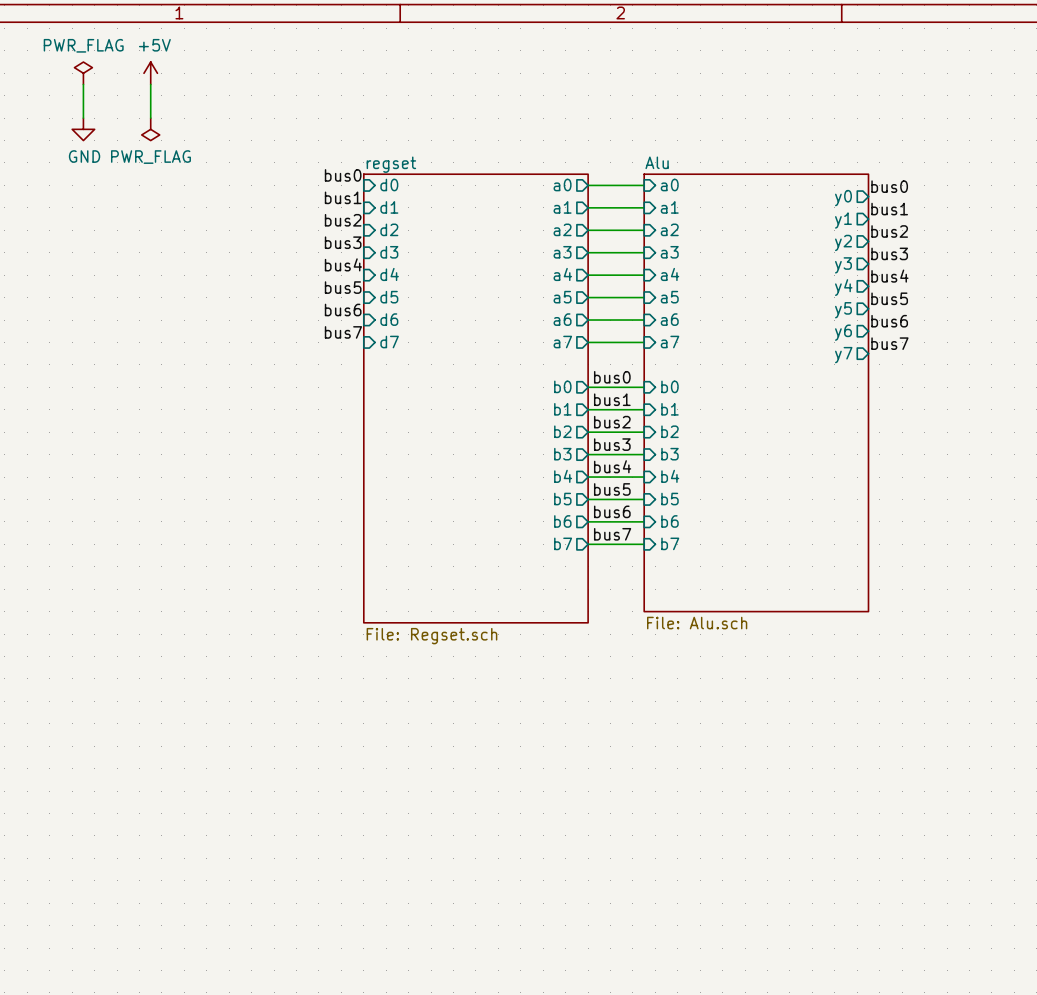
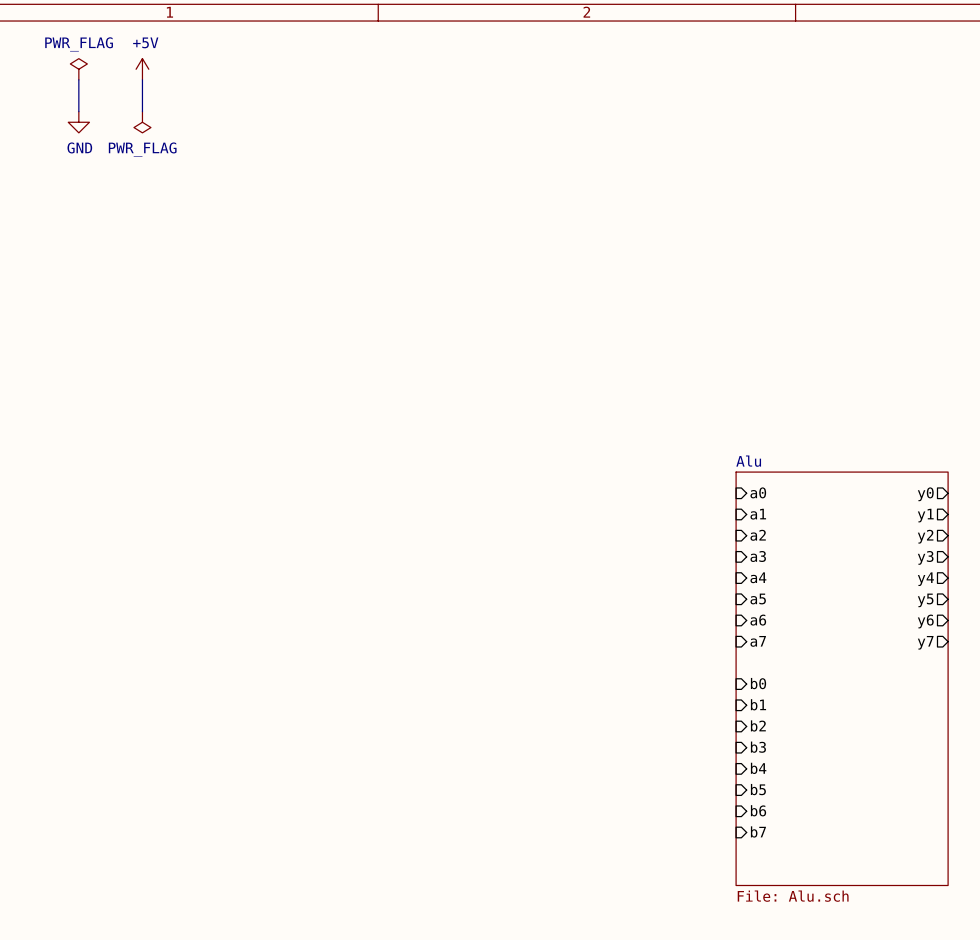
label: bus0 (343, 175) -> none
sheet pin: d0 (389, 185) -> none
sheet pin: a0 (562, 185) -> none
wire: (588, 185) (644, 185) -> none
sheet pin: a0 (669, 185) -> none
label: bus0 (889, 186) -> none
label: bus1 (343, 197) -> none
sheet pin: y0 (843, 198) -> none
sheet pin: d1 (389, 207) -> none
sheet pin: a1 (562, 207) -> none
wire: (588, 207) (644, 207) -> none
sheet pin: a1 (669, 207) -> none
label: bus1 (889, 209) -> none
label: bus2 (343, 220) -> none
sheet pin: y1 (843, 220) -> none
sheet pin: d2 (389, 229) -> none
sheet pin: a2 (562, 229) -> none
sheet pin: a2 (669, 229) -> none
wire: (588, 230) (644, 230) -> none
label: bus2 (889, 231) -> none
label: bus3 (343, 242) -> none
sheet pin: y2 (843, 242) -> none
sheet pin: d3 (389, 252) -> none
sheet pin: a3 (562, 252) -> none
wire: (588, 252) (644, 252) -> none
sheet pin: a3 (669, 252) -> none
label: bus3 (889, 253) -> none
label: bus4 (343, 264) -> none
sheet pin: y3 (843, 265) -> none
sheet pin: d4 (389, 274) -> none
sheet pin: a4 (562, 274) -> none
sheet pin: a4 (670, 274) -> none
wire: (588, 275) (644, 275) -> none
label: bus4 (889, 276) -> none
label: bus5 (343, 287) -> none
sheet pin: y4 (843, 287) -> none
sheet pin: d5 (389, 297) -> none
sheet pin: a5 (562, 297) -> none
wire: (588, 297) (644, 297) -> none
sheet pin: a5 (669, 297) -> none
label: bus5 (889, 298) -> none
label: bus6 (343, 310) -> none
sheet pin: y5 (843, 310) -> none
sheet pin: d6 (389, 319) -> none
sheet pin: a6 (562, 319) -> none
sheet pin: a6 (669, 319) -> none
wire: (588, 320) (644, 320) -> none
label: bus6 (889, 321) -> none
label: bus7 (343, 332) -> none
sheet pin: y6 (843, 332) -> none
sheet pin: d7 (389, 342) -> none
sheet pin: a7 (562, 342) -> none
wire: (588, 342) (644, 342) -> none
sheet pin: a7 (670, 342) -> none
label: bus7 (889, 343) -> none
sheet pin: y7 (843, 355) -> none
label: bus0 (612, 377) -> none
sheet pin: b0 (562, 386) -> none
sheet pin: b0 (670, 386) -> none
wire: (588, 387) (644, 387) -> none
sheet Alu: File: Alu.sch (756, 392) -> none
sheet regset: File: Regset.sch (475, 398) -> none
label: bus1 (612, 399) -> none
sheet pin: b1 (562, 409) -> none
wire: (588, 409) (644, 409) -> none
sheet pin: b1 (670, 409) -> none
label: bus2 (612, 422) -> none
sheet pin: b2 (562, 431) -> none
sheet pin: b2 (670, 431) -> none
wire: (588, 432) (644, 432) -> none
label: bus3 (612, 444) -> none
sheet pin: b3 (562, 454) -> none
wire: (588, 454) (644, 454) -> none
sheet pin: b3 (670, 454) -> none
label: bus4 (612, 466) -> none
sheet pin: b4 (563, 476) -> none
sheet pin: b4 (670, 476) -> none
wire: (588, 477) (644, 477) -> none
label: bus5 (612, 489) -> none
sheet pin: b5 (562, 499) -> none
wire: (588, 499) (644, 499) -> none
sheet pin: b5 (670, 499) -> none
label: bus6 (612, 511) -> none
sheet pin: b6 (562, 521) -> none
wire: (588, 521) (644, 521) -> none
sheet pin: b6 (670, 521) -> none
sheet pin: none -> a0 (758, 492)
sheet pin: none -> y0 (925, 494)
label: bus7 (612, 534) -> none
sheet pin: b7 (563, 543) -> none
sheet pin: b7 (670, 543) -> none
sheet pin: none -> a1 (758, 514)
wire: (588, 544) (644, 544) -> none
sheet pin: none -> y1 (925, 515)
sheet pin: none -> a2 (758, 535)
sheet pin: none -> y2 (925, 536)
sheet pin: none -> a3 (758, 556)
sheet pin: none -> y3 (925, 557)
sheet pin: none -> a4 (758, 577)
sheet pin: none -> y4 (925, 579)
sheet pin: none -> a5 (758, 598)
sheet pin: none -> y5 (925, 600)
sheet pin: none -> a6 (758, 620)
sheet pin: none -> y6 (925, 621)
sheet pin: none -> a7 (758, 641)
sheet pin: none -> y7 (925, 642)
sheet Alu: none -> File: Alu.sch (842, 678)
sheet pin: none -> b0 (758, 683)
sheet pin: none -> b1 (758, 704)
sheet pin: none -> b2 (758, 725)
sheet pin: none -> b3 (758, 747)
sheet pin: none -> b4 (758, 768)
sheet pin: none -> b5 (758, 789)
sheet pin: none -> b6 (758, 810)
sheet pin: none -> b7 (758, 831)

